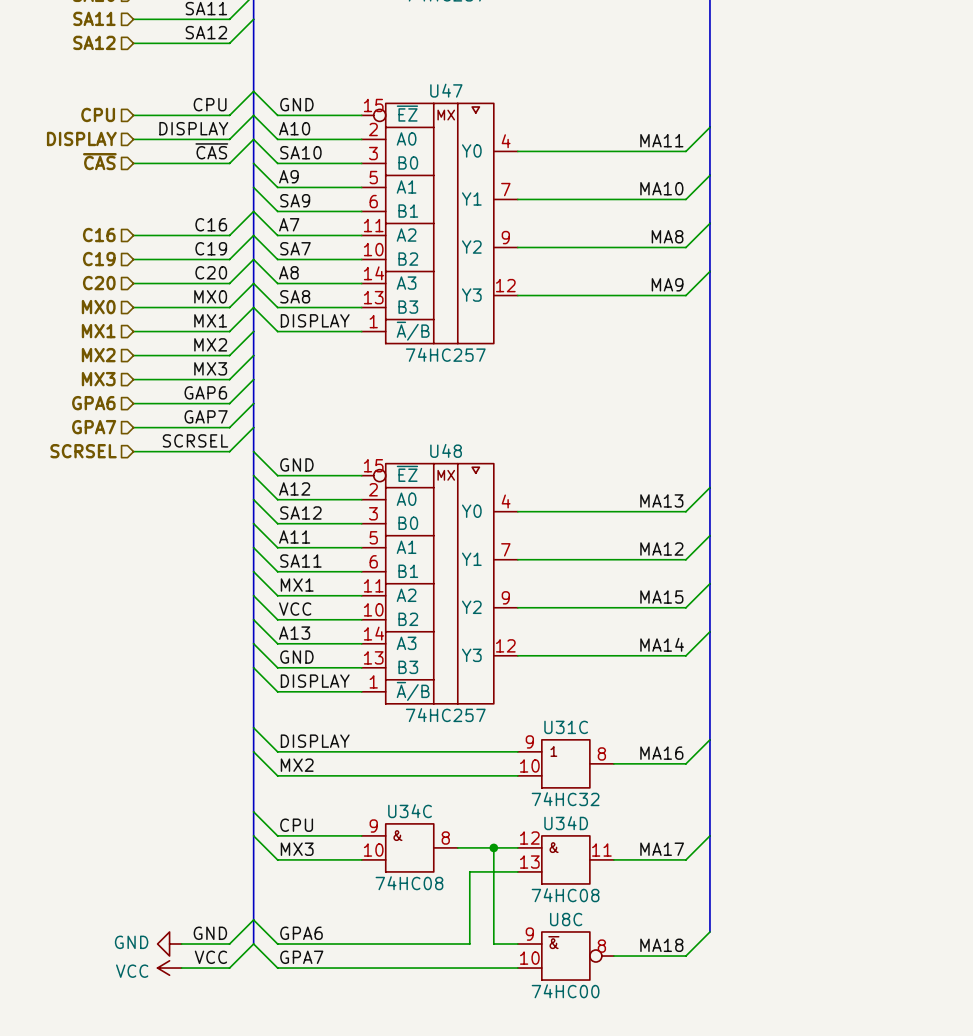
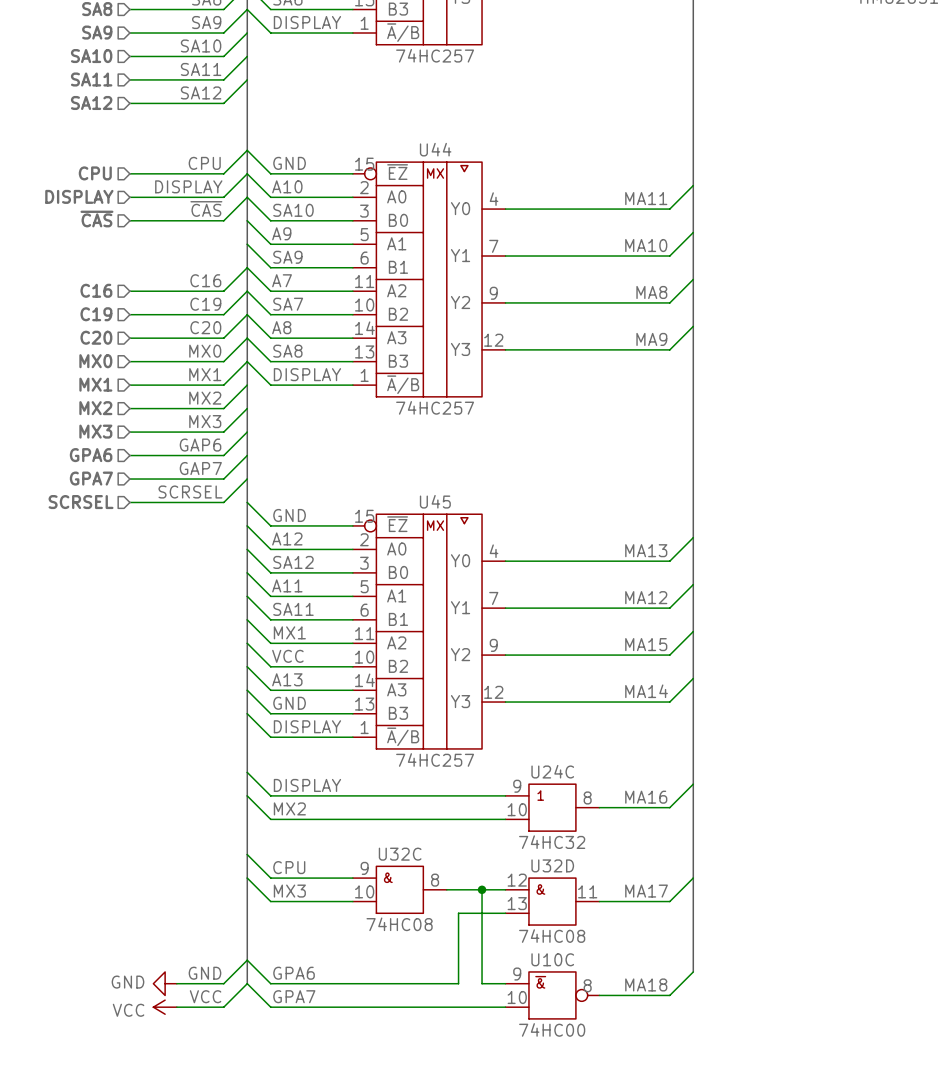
U47 name: U47 (446, 90) -> U44 (435, 149)
U48 name: U48 (446, 450) -> U45 (435, 501)
U31C name: U31C (566, 727) -> U24C (552, 771)
U34C name: U34C (410, 811) -> U32C (400, 854)
U34D name: U34D (566, 823) -> U32D (552, 865)
U8C name: U8C (566, 919) -> U10C (552, 959)

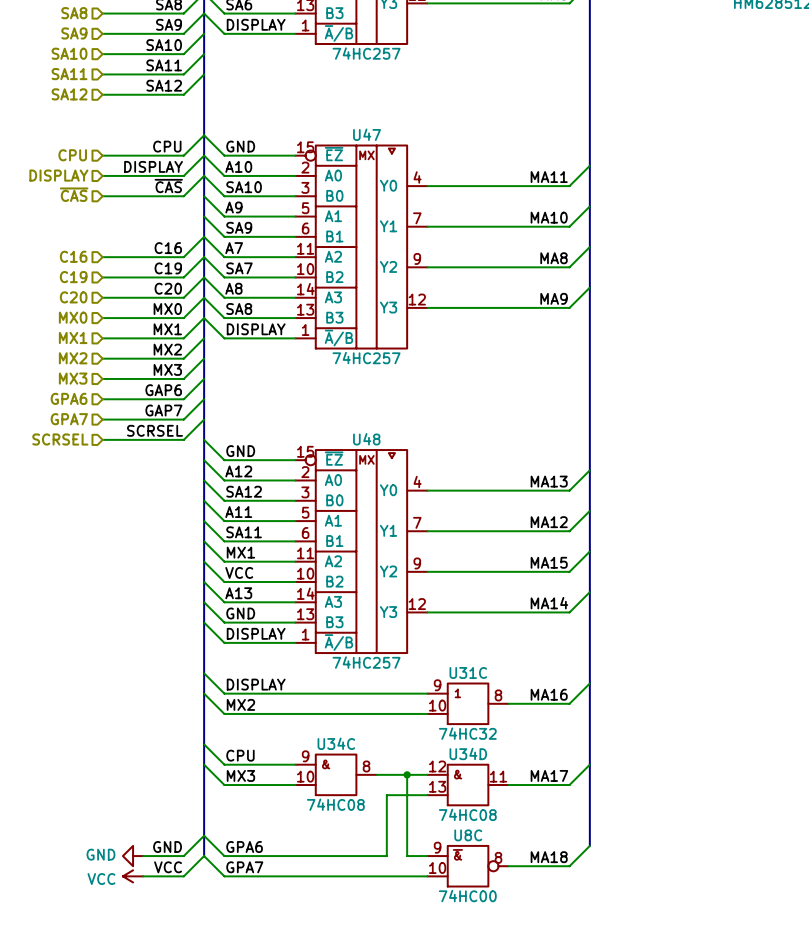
U44 name: U44 (435, 149) -> U47 (367, 134)
U45 name: U45 (435, 501) -> U48 (366, 439)
U24C name: U24C (552, 771) -> U31C (468, 672)
U32C name: U32C (400, 854) -> U34C (336, 743)
U32D name: U32D (552, 865) -> U34D (468, 753)
U10C name: U10C (552, 959) -> U8C (468, 835)

